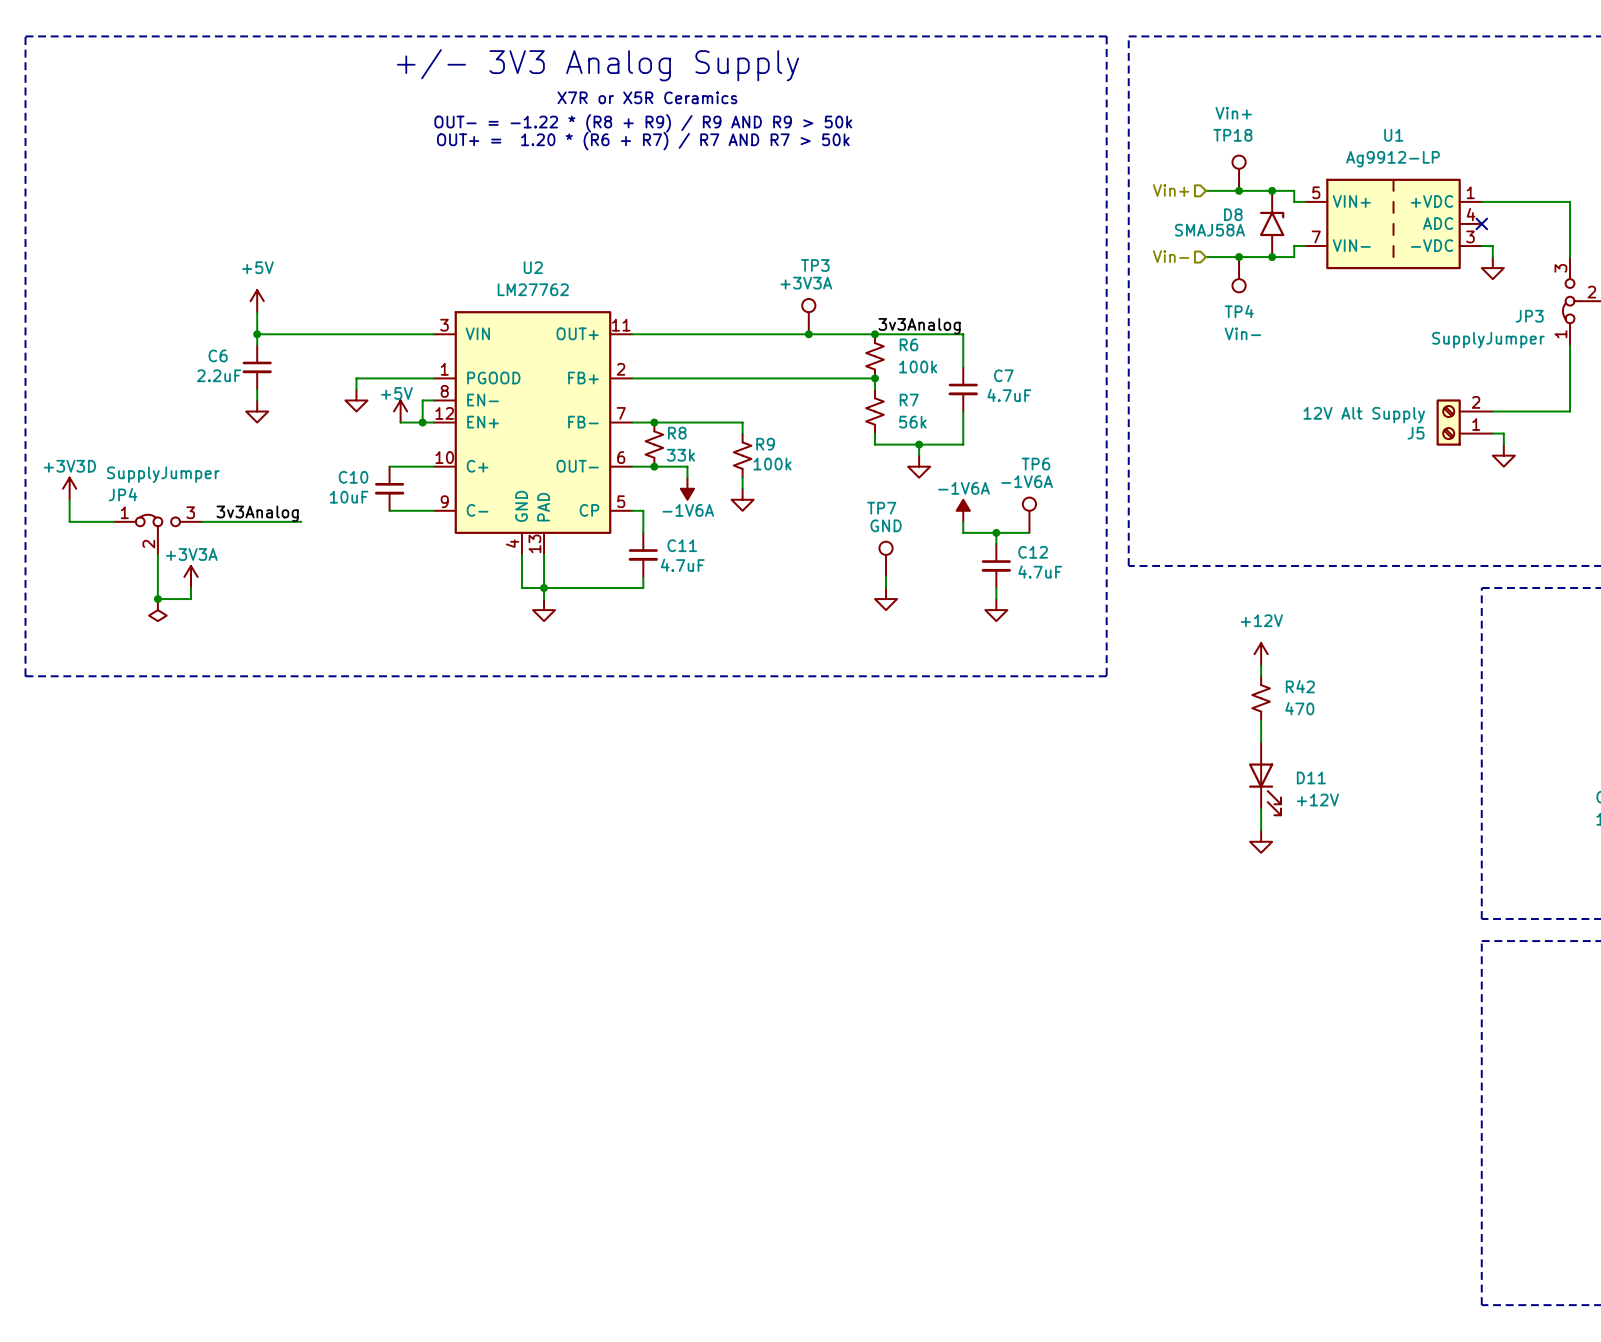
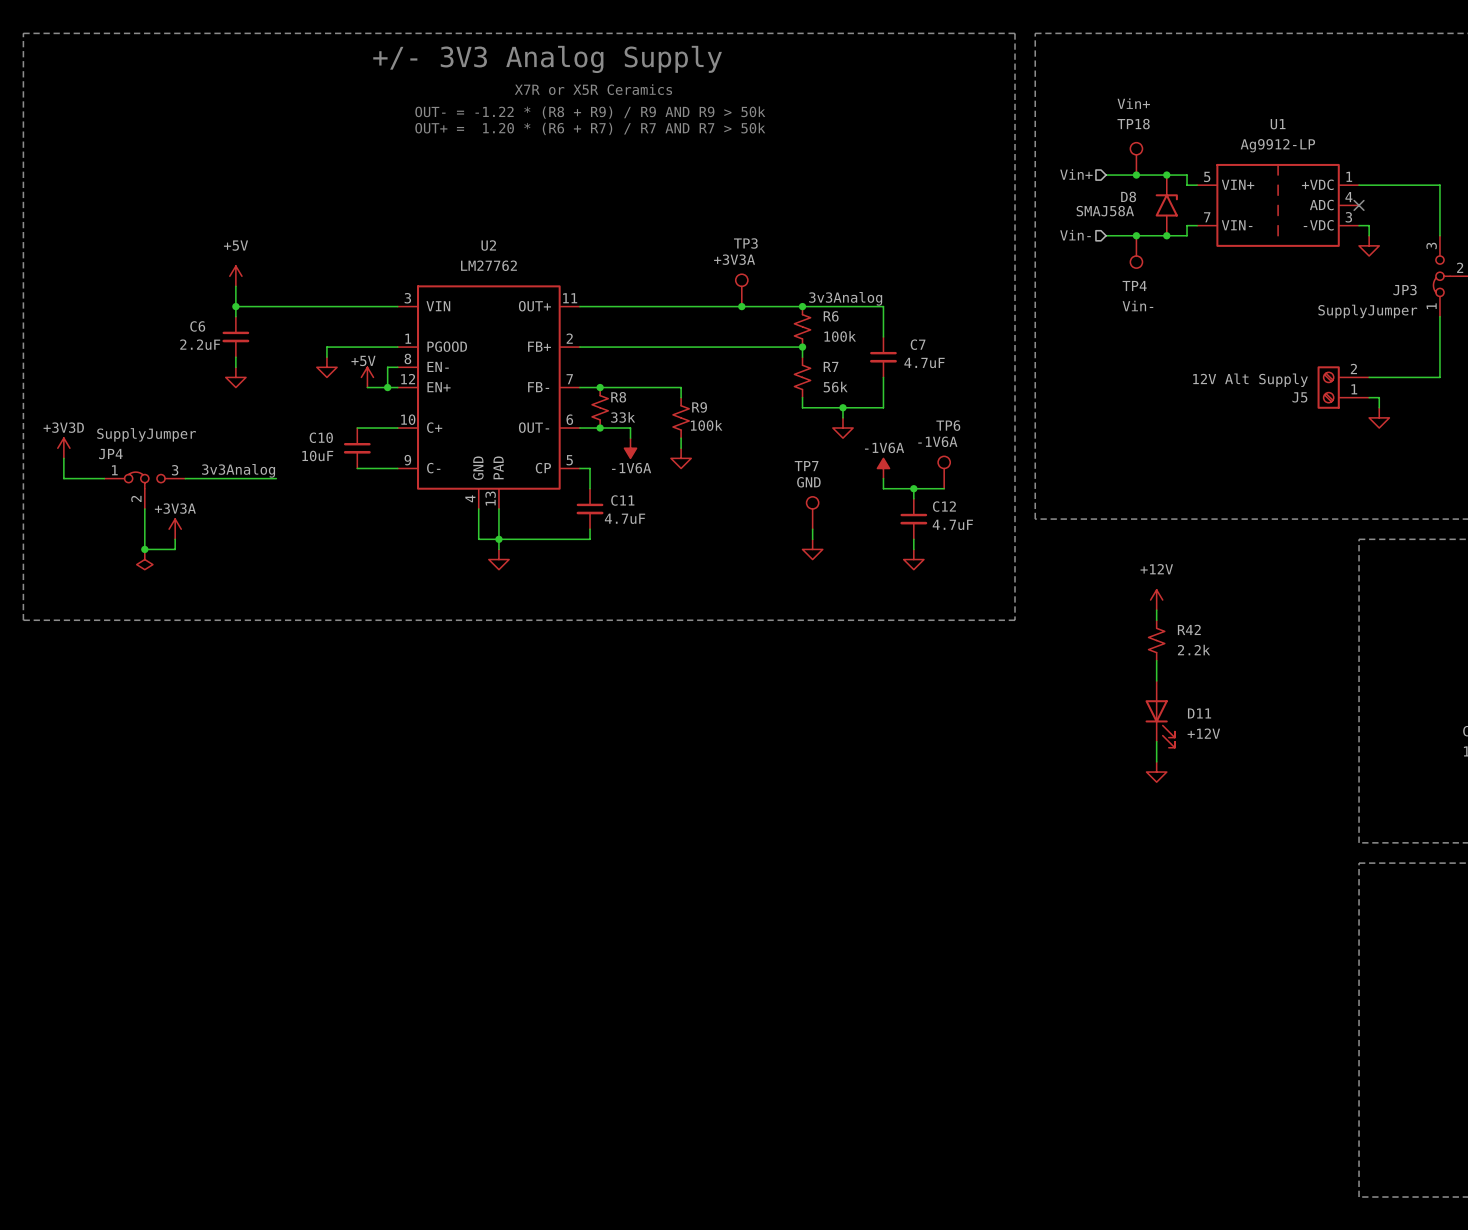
R42 value: 470 (1299, 708) -> 2.2k (1194, 650)

